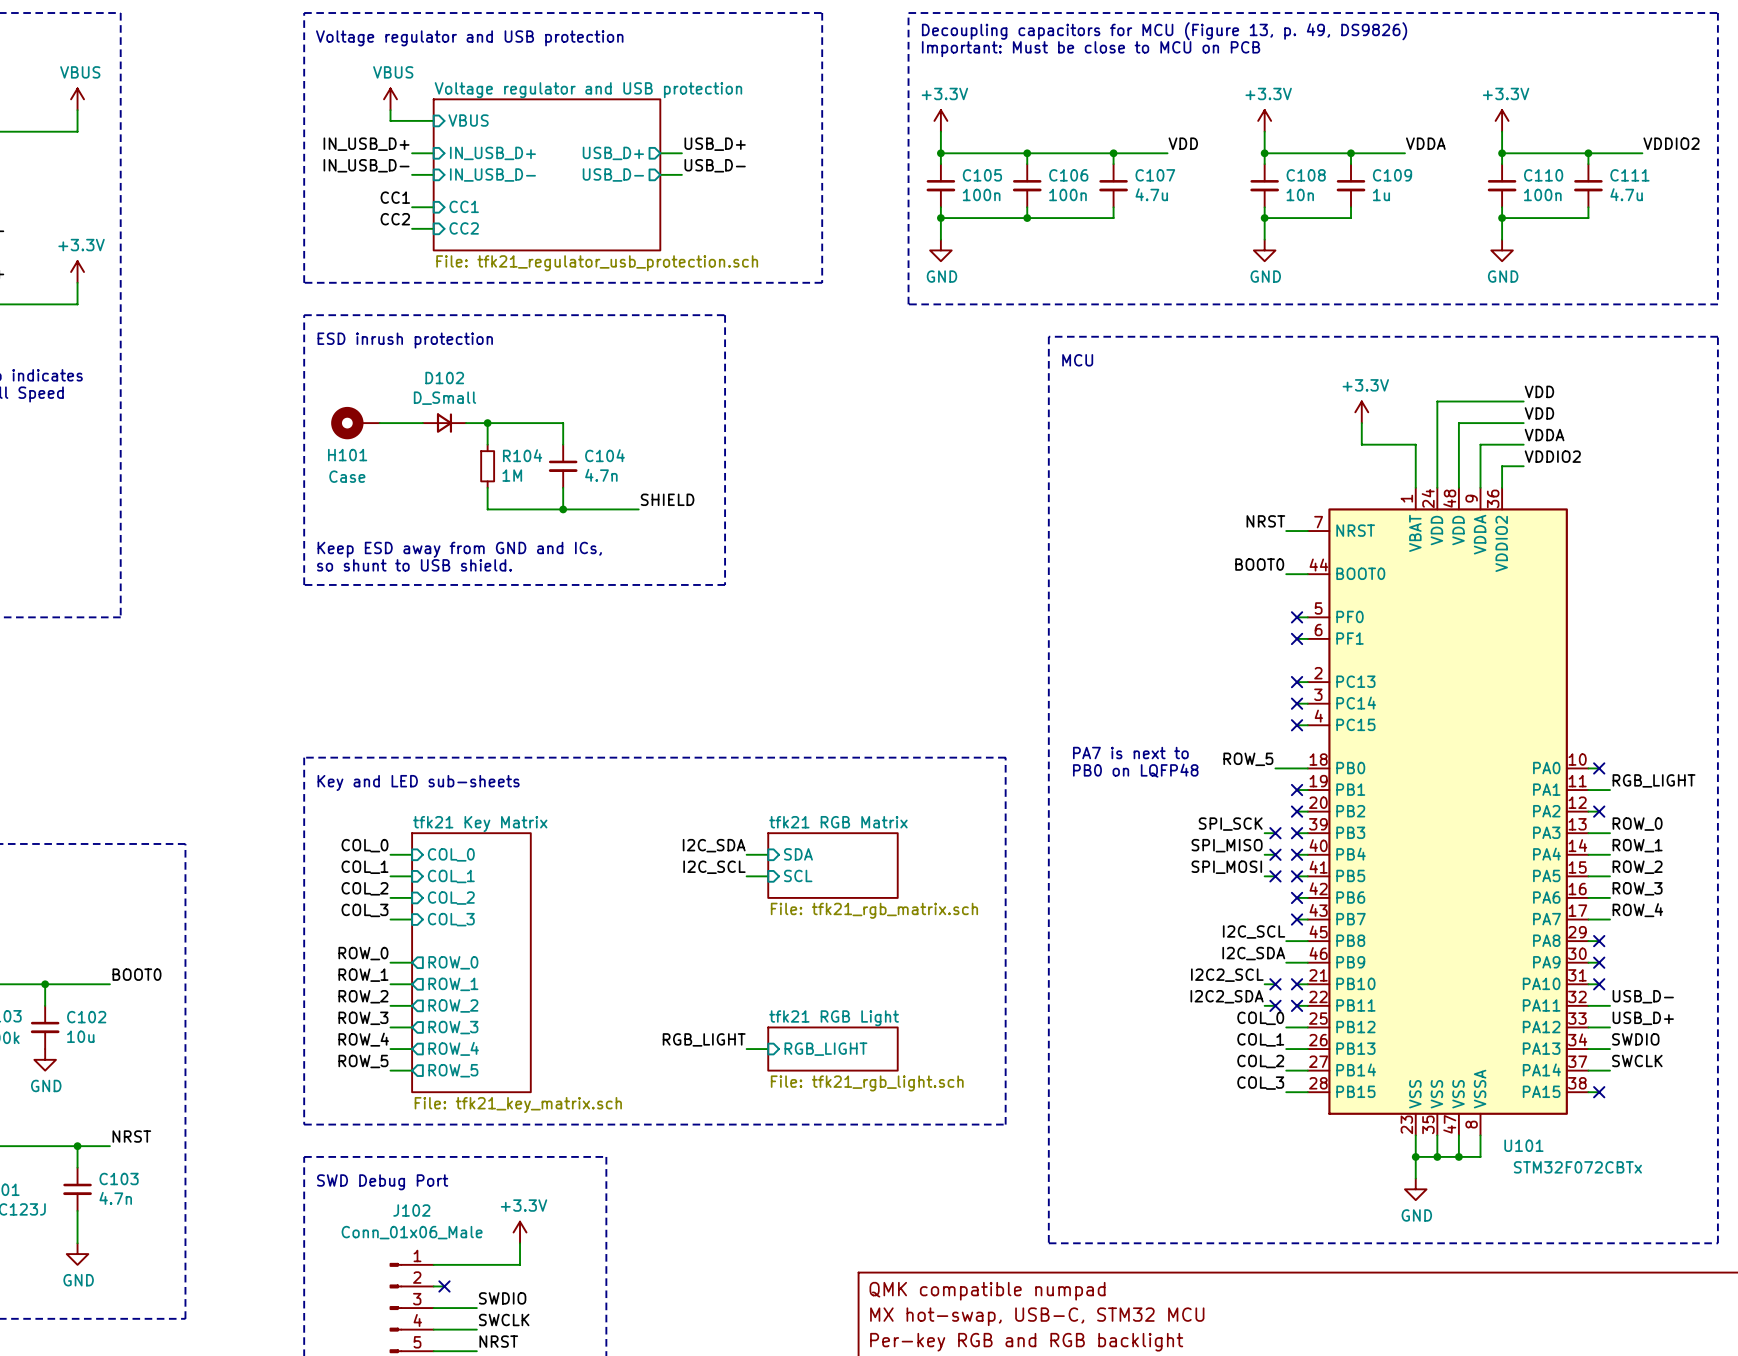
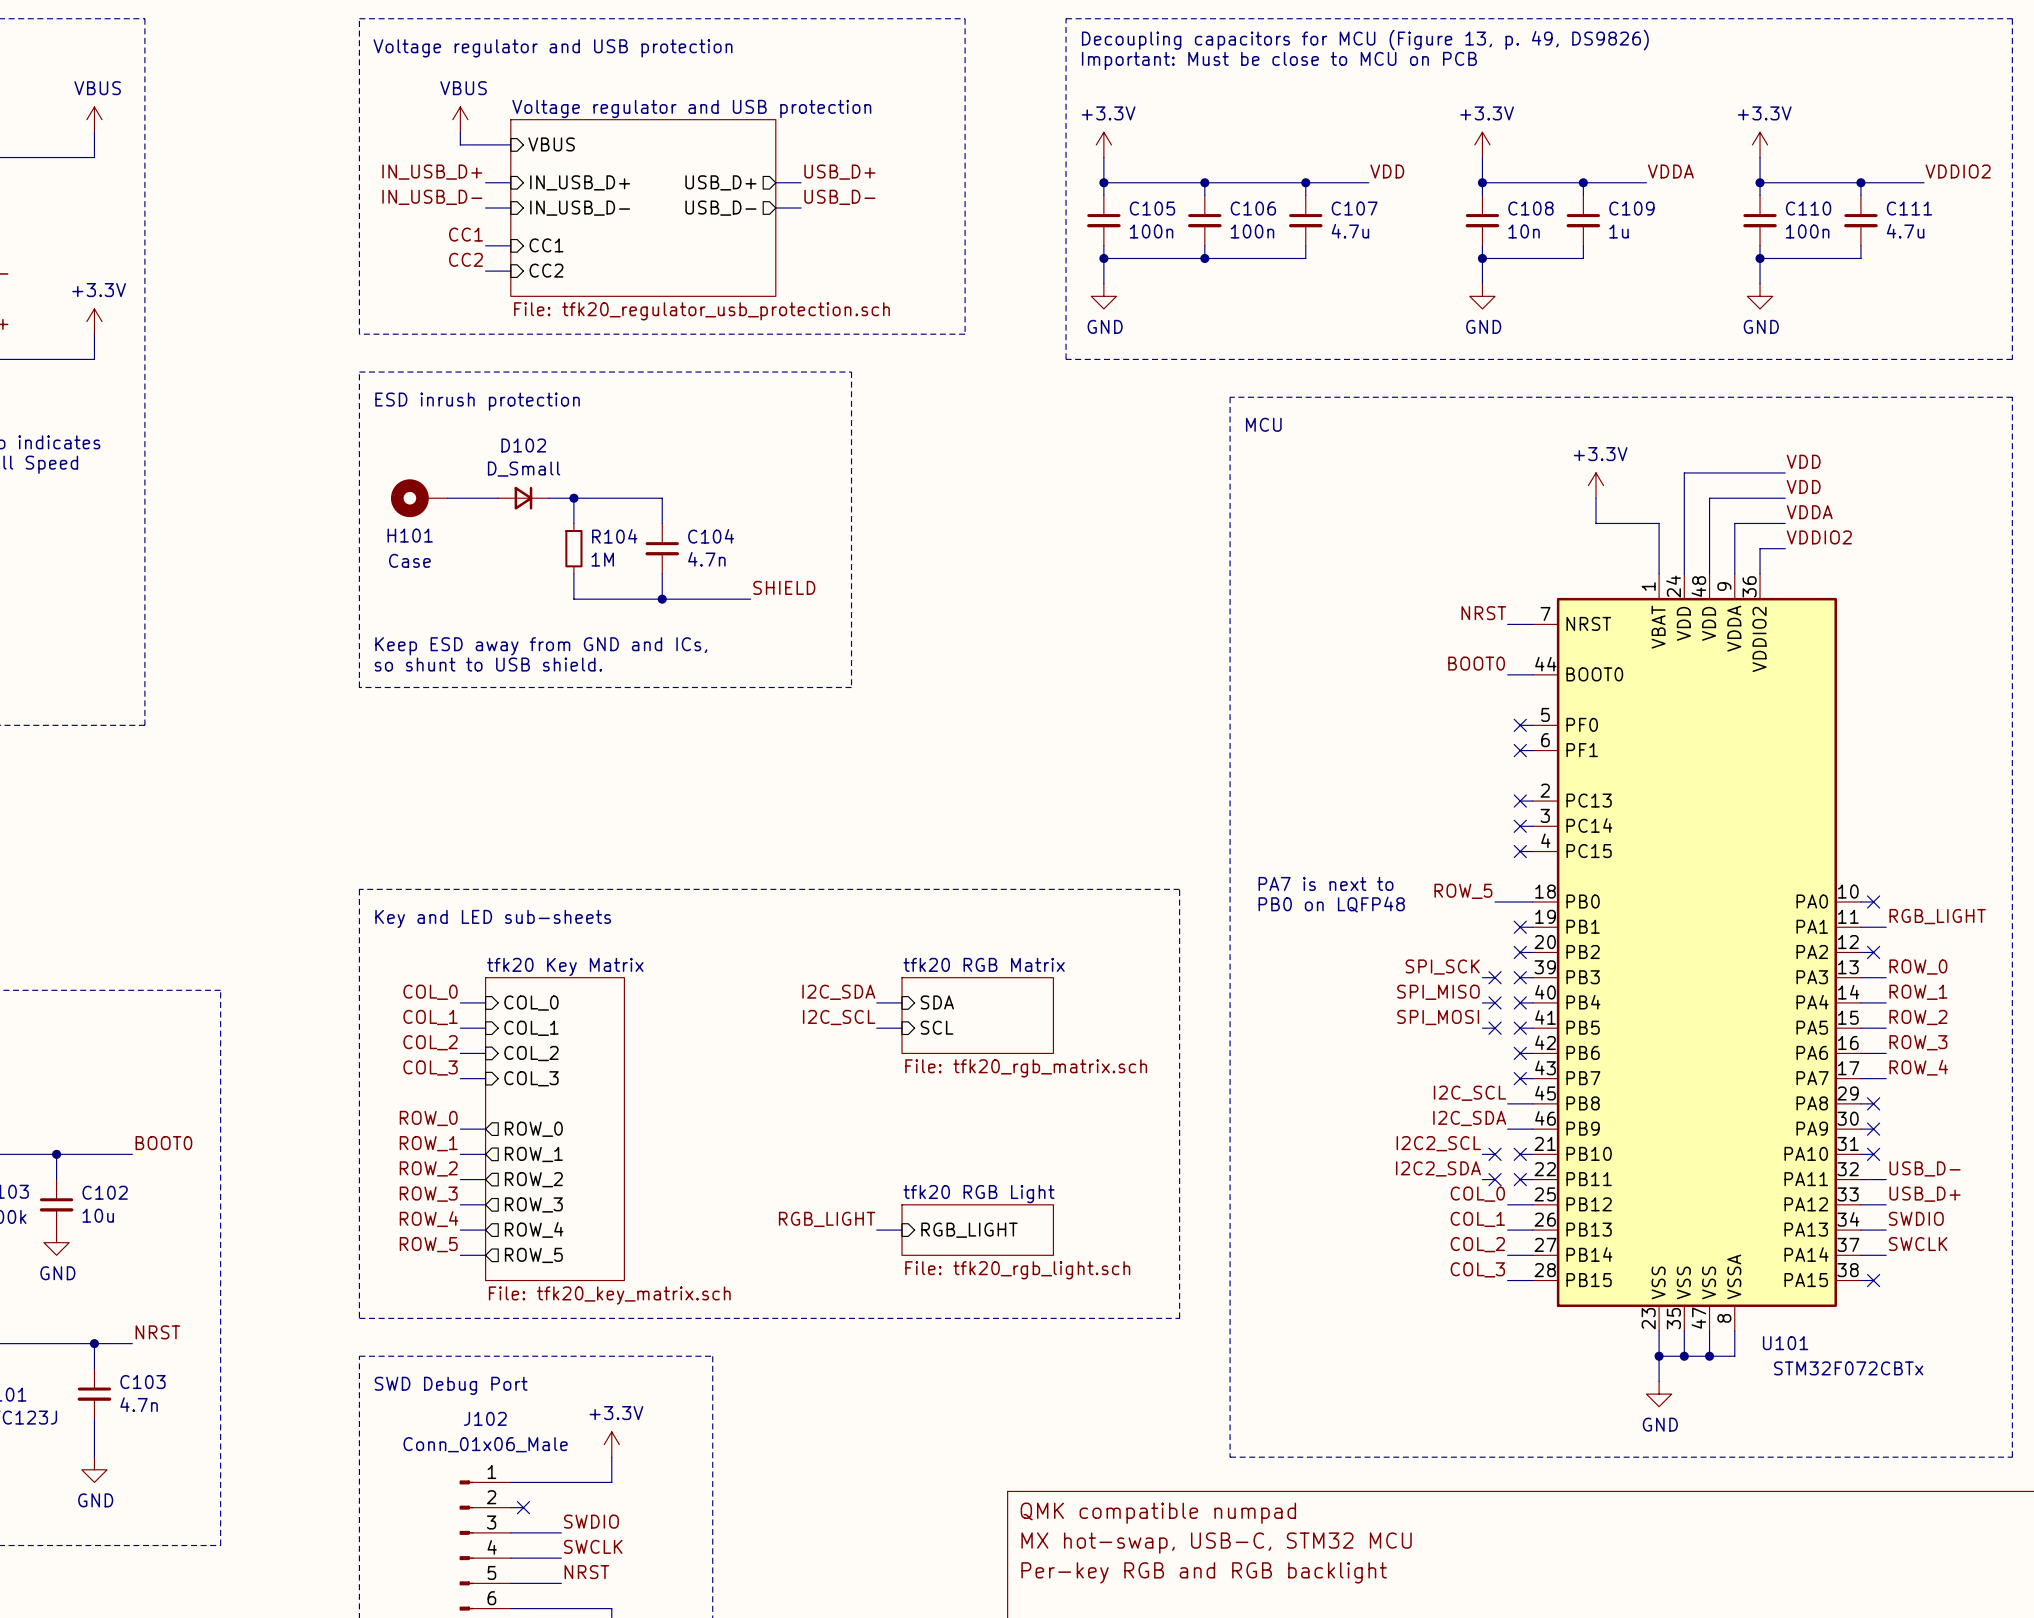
sheet Voltage regulator and USB protection value: File: tfk21_regulator_usb_protection.sch (597, 263) -> File: tfk20_regulator_usb_protection.sch (702, 311)
sheet tfk21 RGB Matrix name: tfk21 RGB Matrix (838, 822) -> tfk20 RGB Matrix (984, 964)
sheet tfk21 Key Matrix name: tfk21 Key Matrix (480, 824) -> tfk20 Key Matrix (565, 966)
sheet tfk21 RGB Matrix value: File: tfk21_rgb_matrix.sch (874, 910) -> File: tfk20_rgb_matrix.sch (1026, 1068)
sheet tfk21 RGB Light name: tfk21 RGB Light (834, 1018) -> tfk20 RGB Light (978, 1194)
sheet tfk21 RGB Light value: File: tfk21_rgb_light.sch (867, 1083) -> File: tfk20_rgb_light.sch (1017, 1270)
sheet tfk21 Key Matrix value: File: tfk21_key_matrix.sch (518, 1105) -> File: tfk20_key_matrix.sch (609, 1295)

